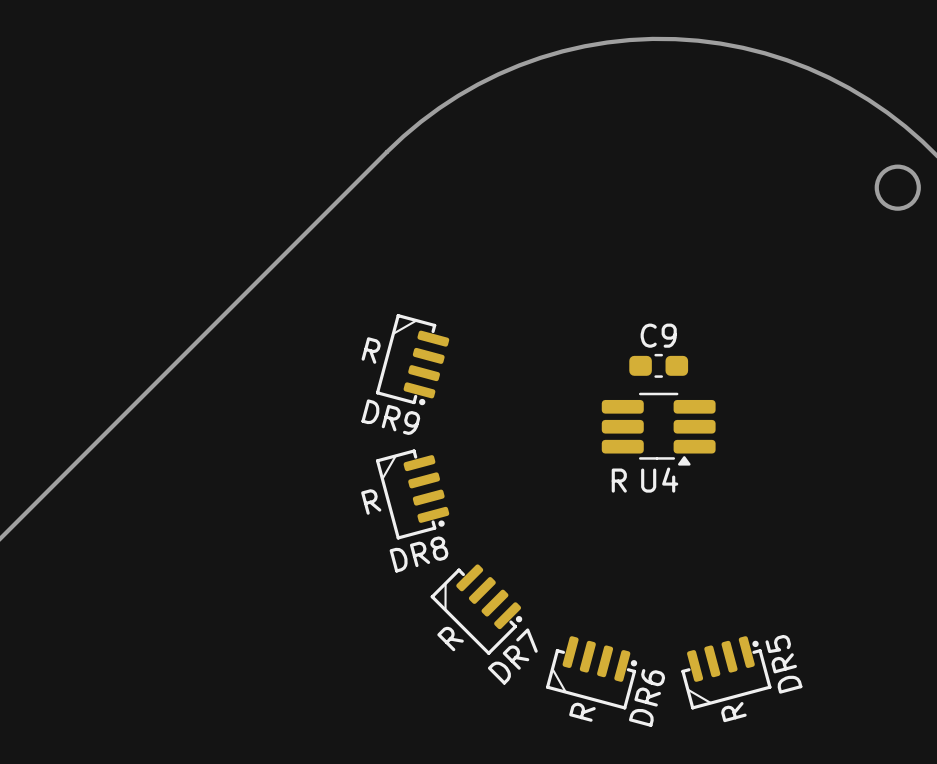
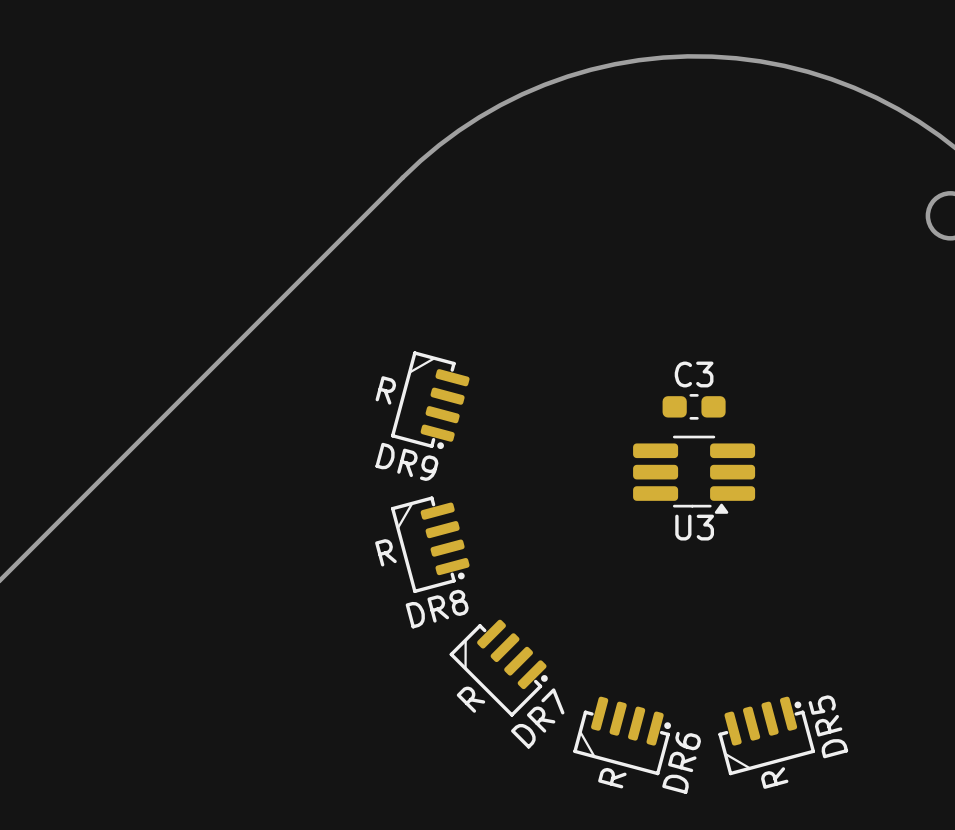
C9 name: C9 (658, 335) -> C3 (694, 374)
U4 text: R (619, 480) -> none
U4 name: U4 (659, 480) -> U3 (694, 527)

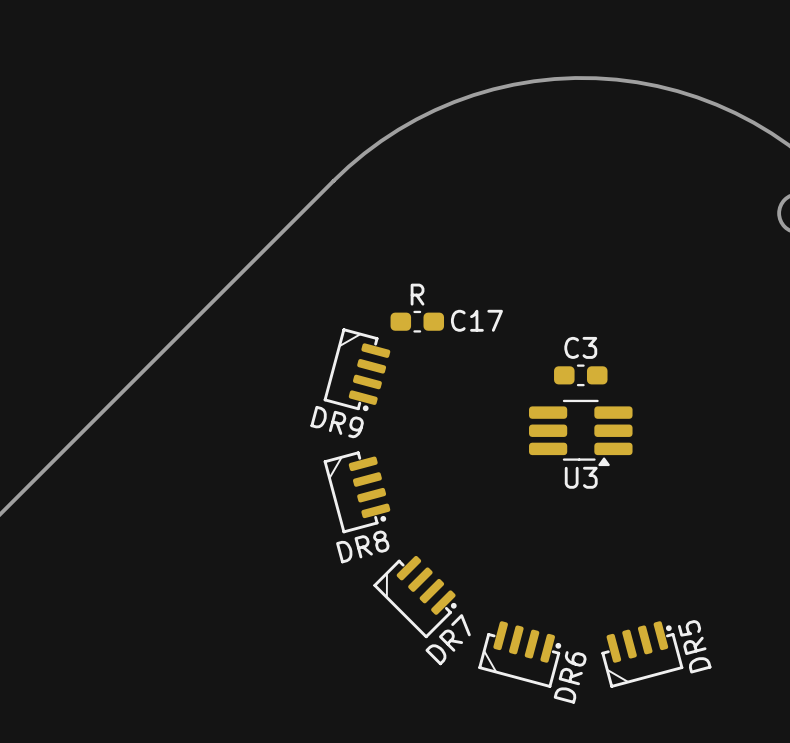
C17: none -> (417, 321)
DR9 text: R (385, 390) -> none
DR8 text: R (385, 552) -> none
DR7 text: R (470, 699) -> none
DR6 text: R (612, 778) -> none
DR5 text: R (774, 778) -> none

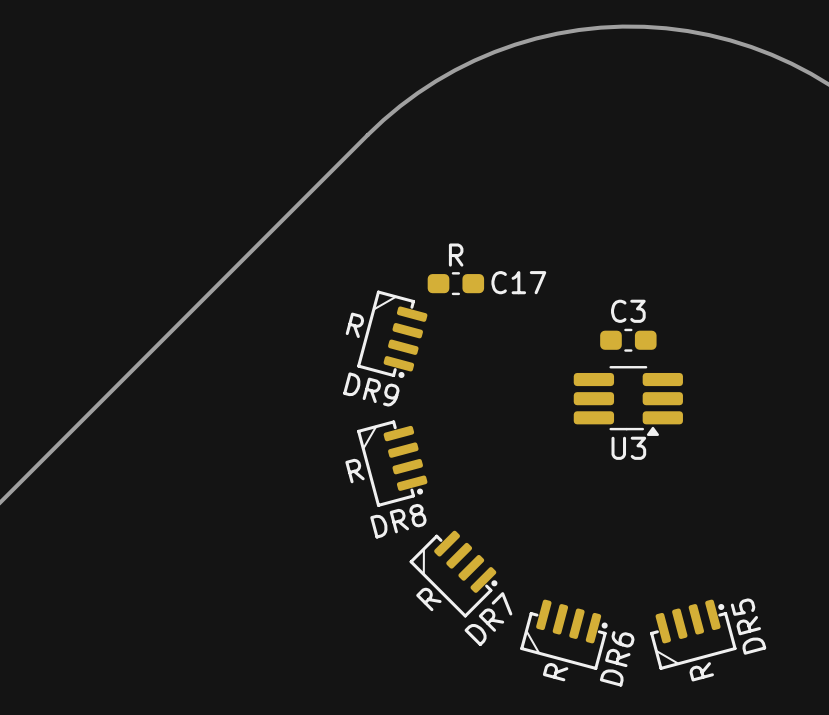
DR9 text: none -> R (354, 325)
DR8 text: none -> R (355, 471)
DR7 text: none -> R (428, 599)
DR6 text: none -> R (555, 672)
DR5 text: none -> R (701, 671)

